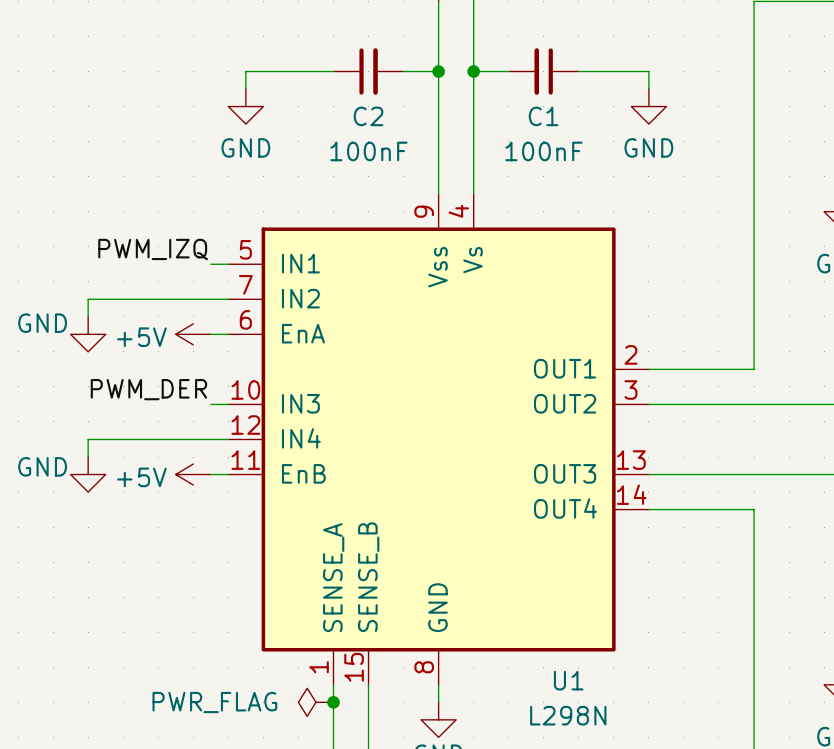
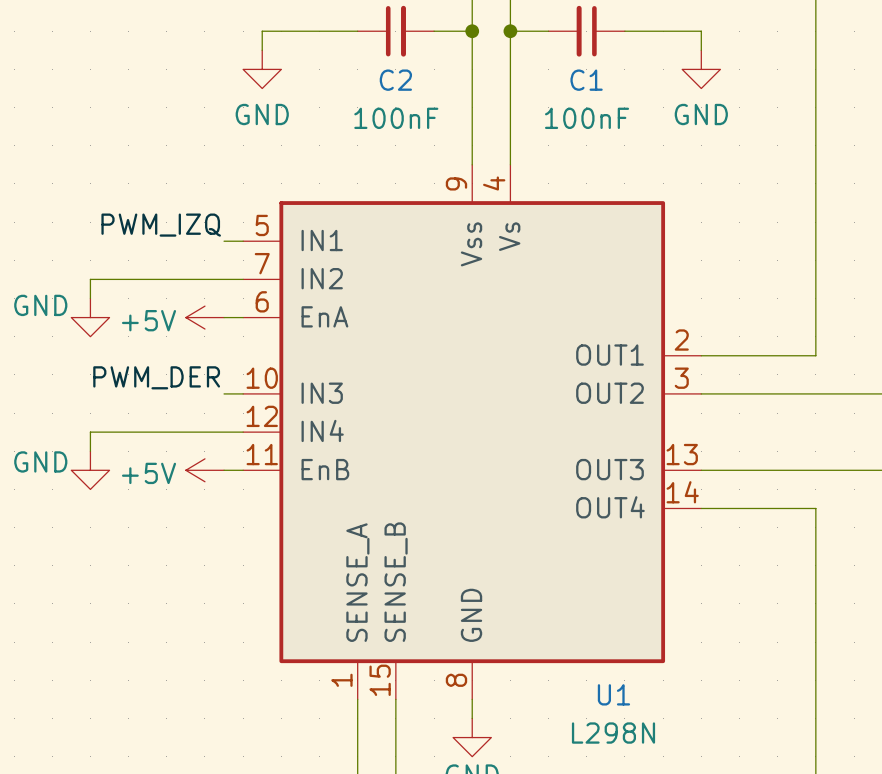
power symbol: PWR_FLAG (315, 702) -> none
junction: (333, 702) -> none

